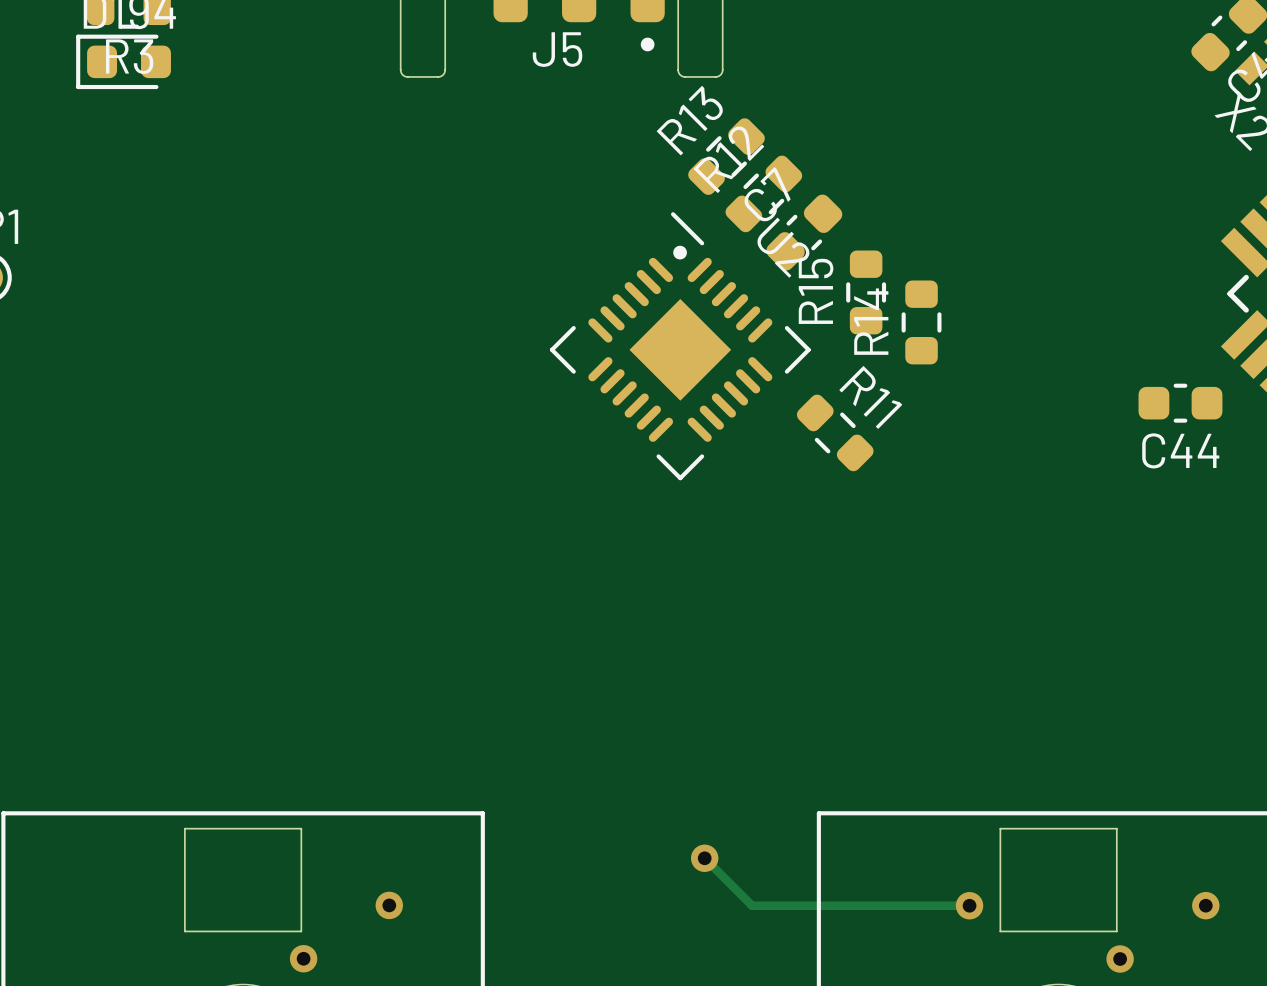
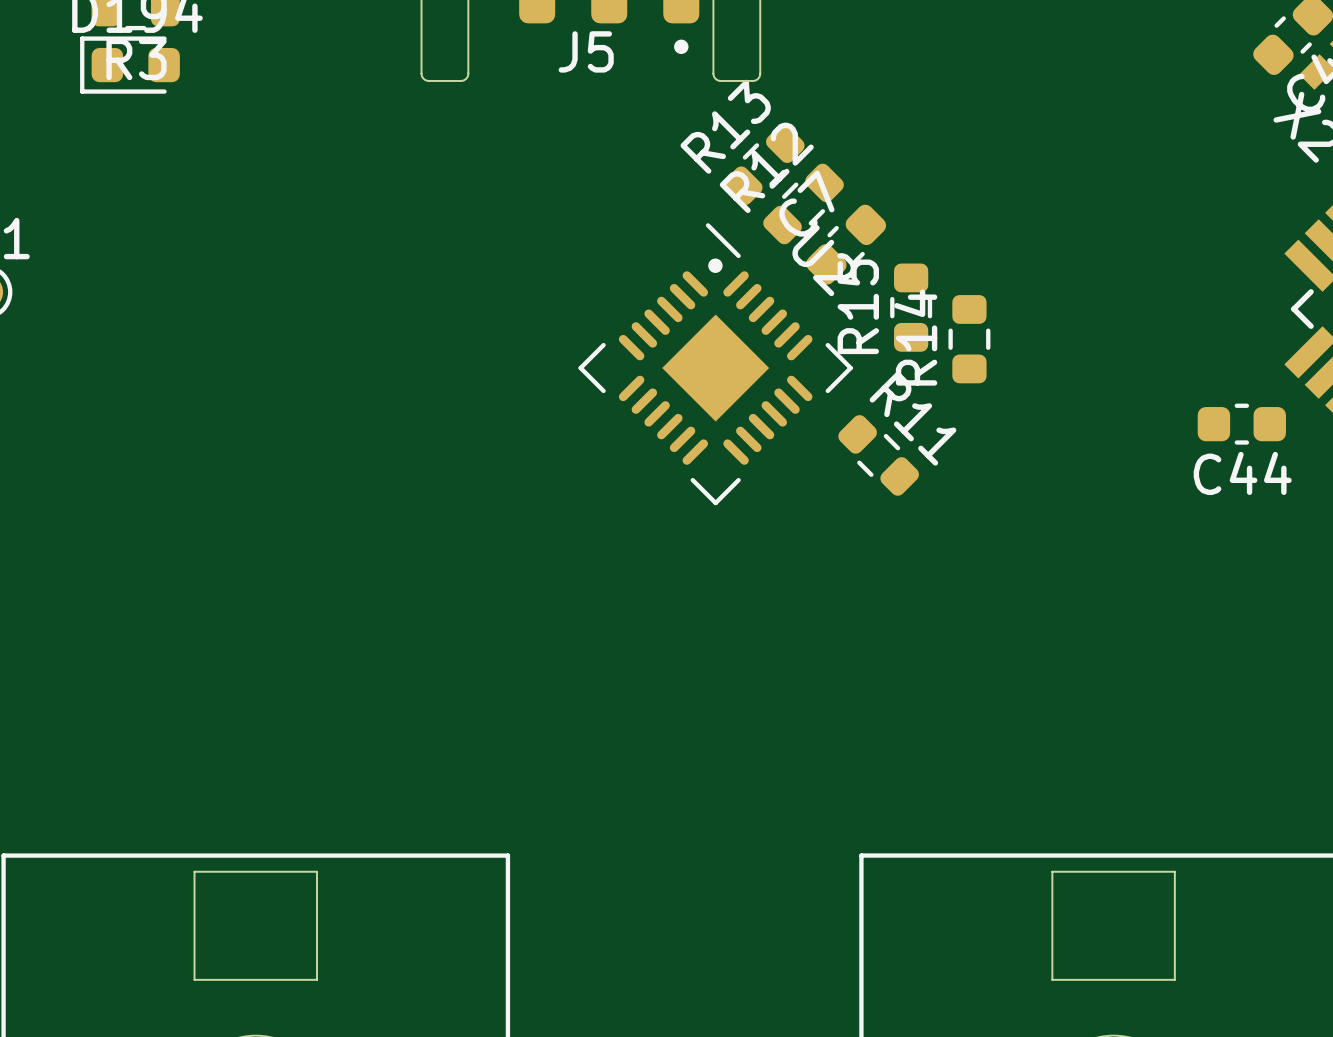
track: (704, 858) (752, 905) (969, 905) -> none
via: (704, 858) -> none
via: (389, 905) -> none
via: (969, 905) -> none
via: (1205, 905) -> none
via: (303, 958) -> none
via: (1120, 959) -> none

